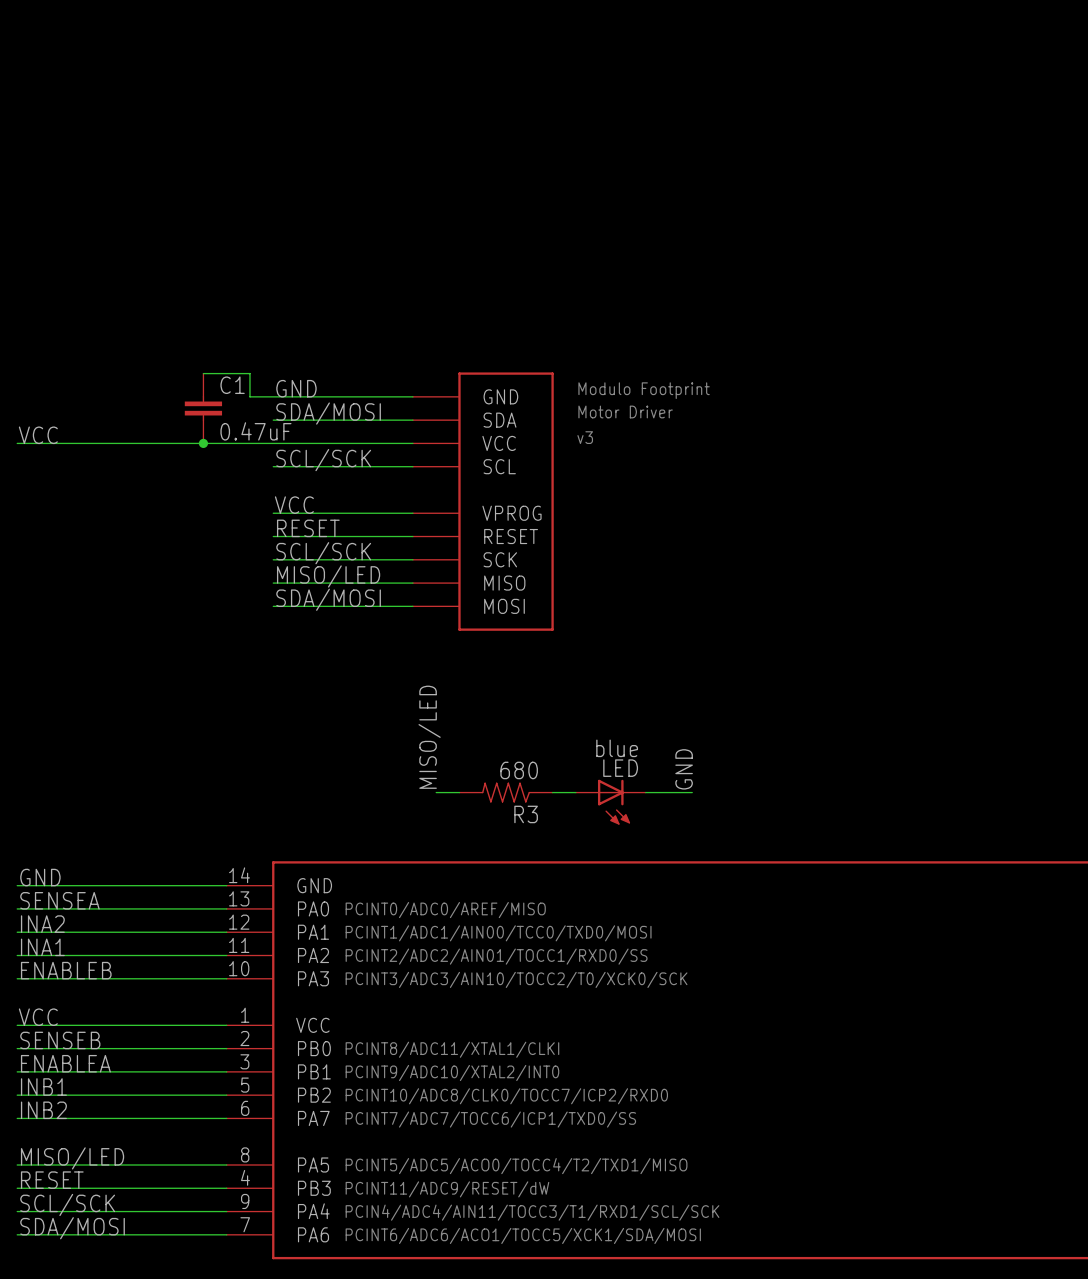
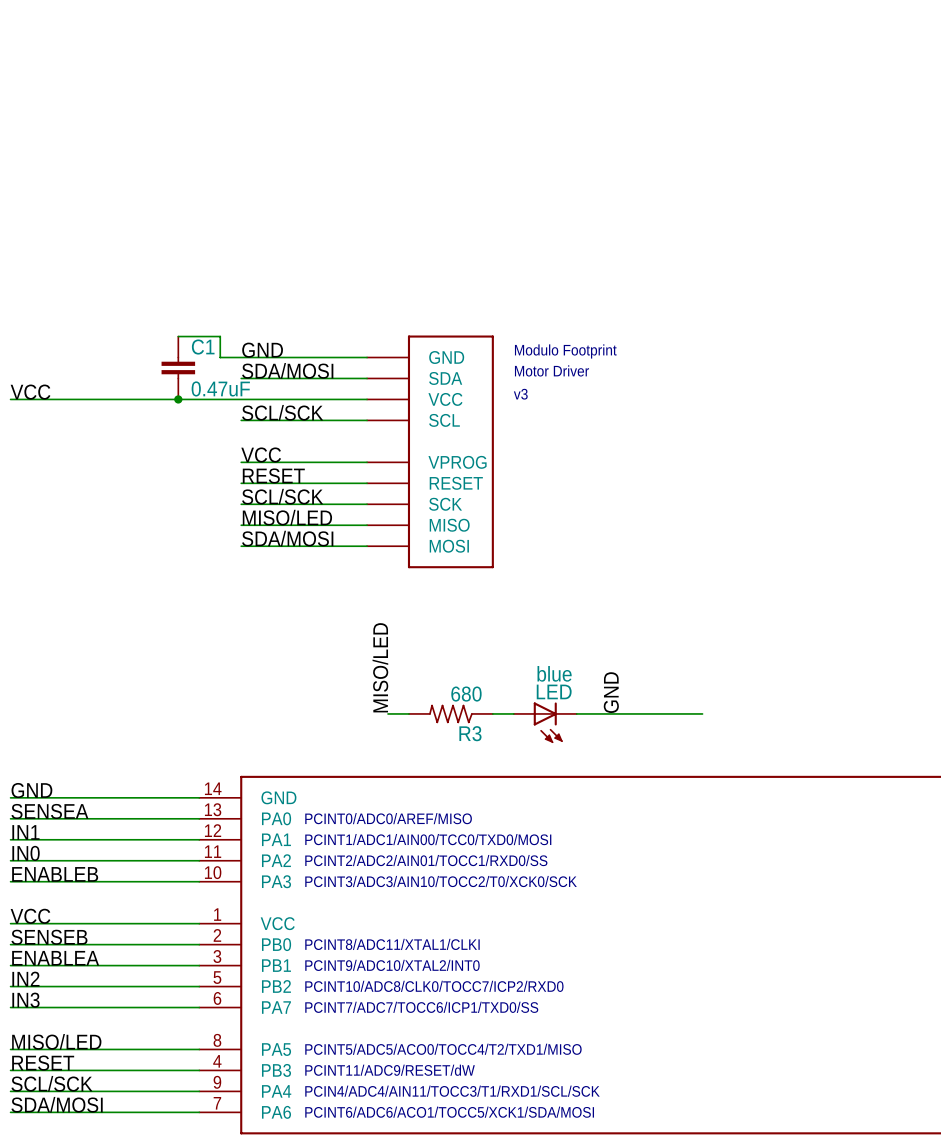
wire: none -> (618, 713) (702, 713)
label: INA2 (42, 924) -> IN1 (25, 832)
label: INA1 (42, 947) -> IN0 (26, 853)
label: INB1 (43, 1087) -> IN2 (25, 979)
label: INB2 (43, 1110) -> IN3 (25, 1000)

